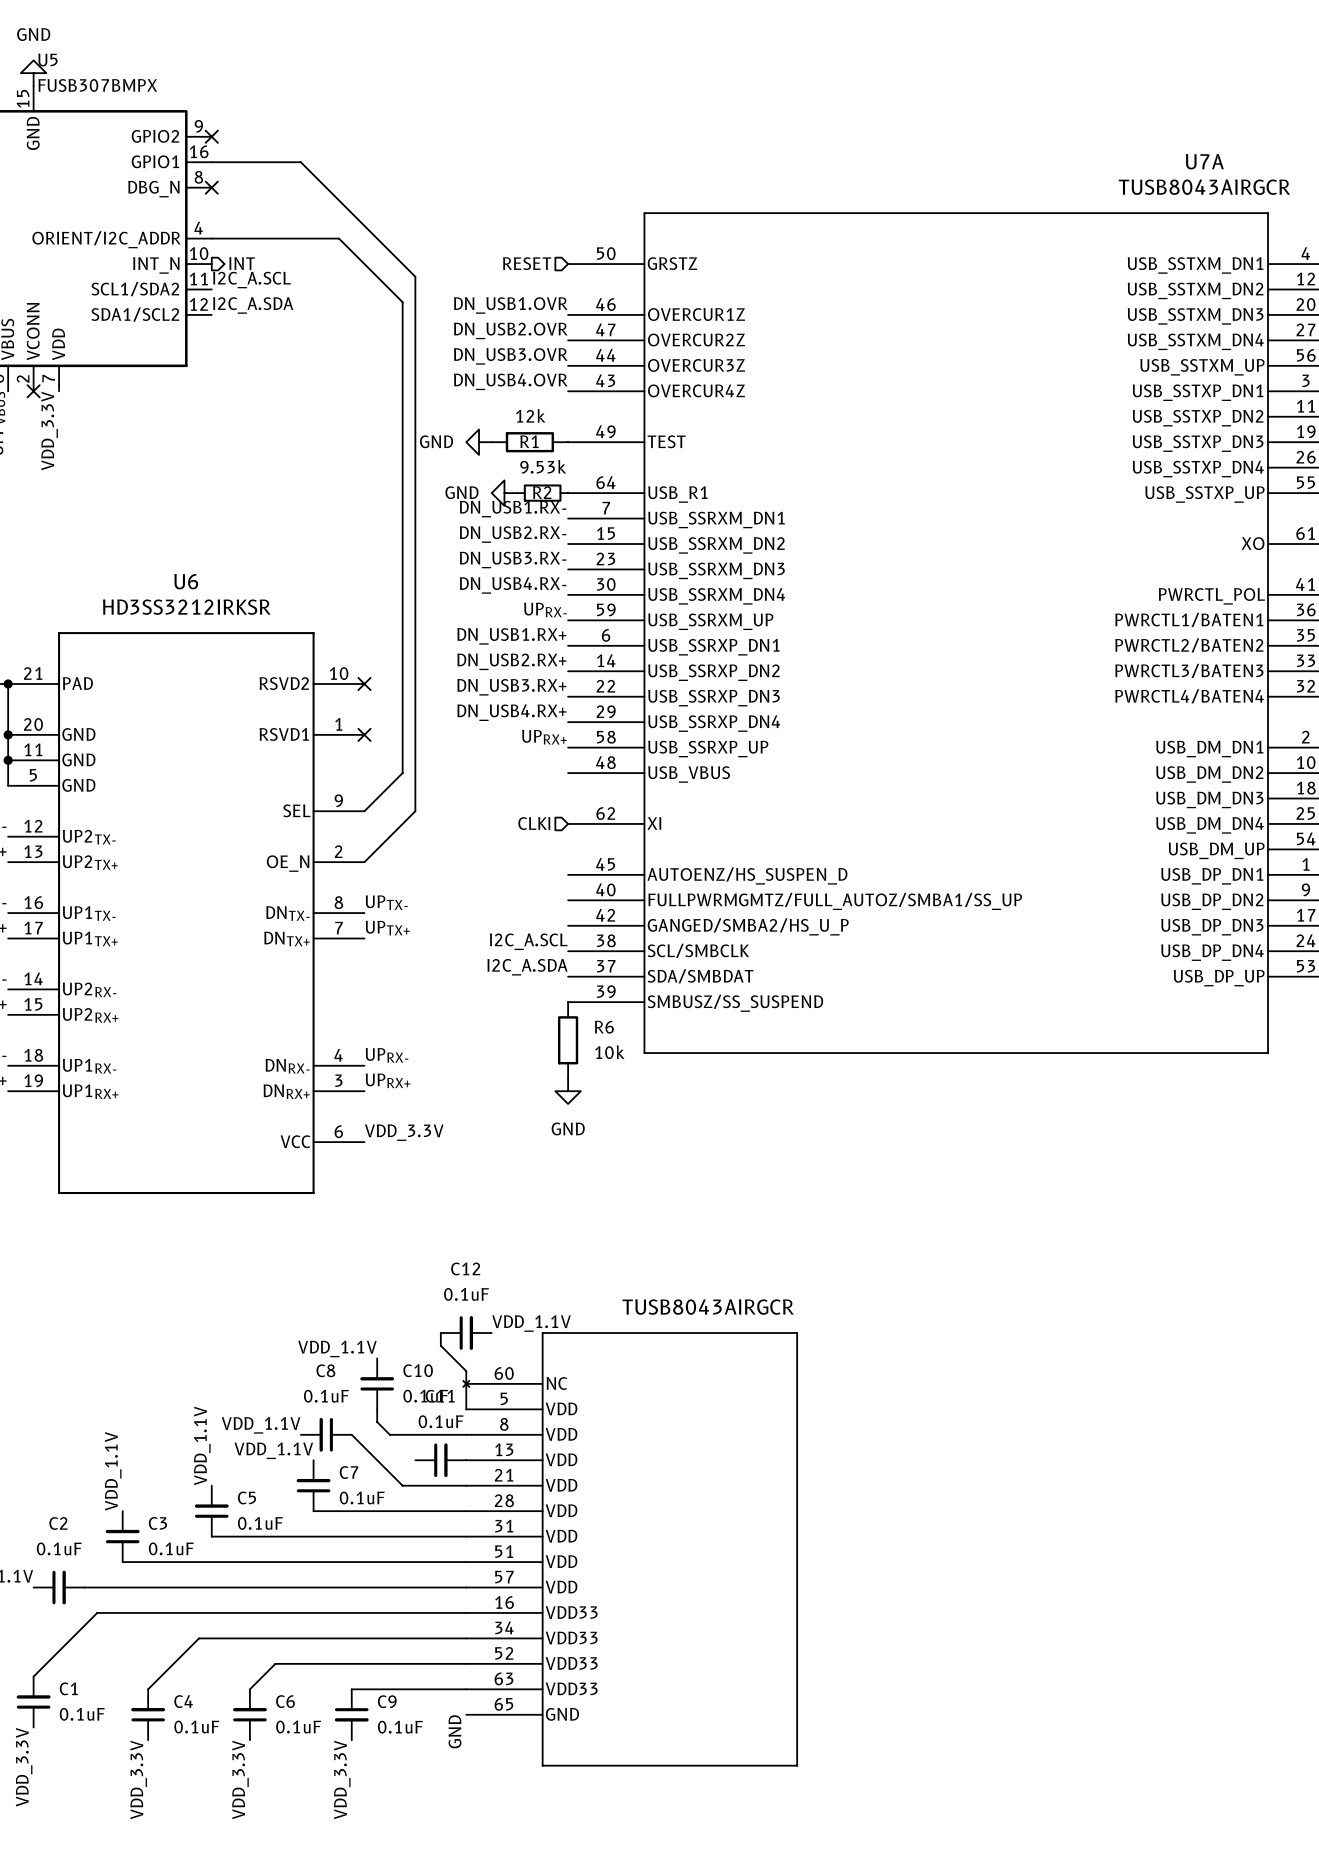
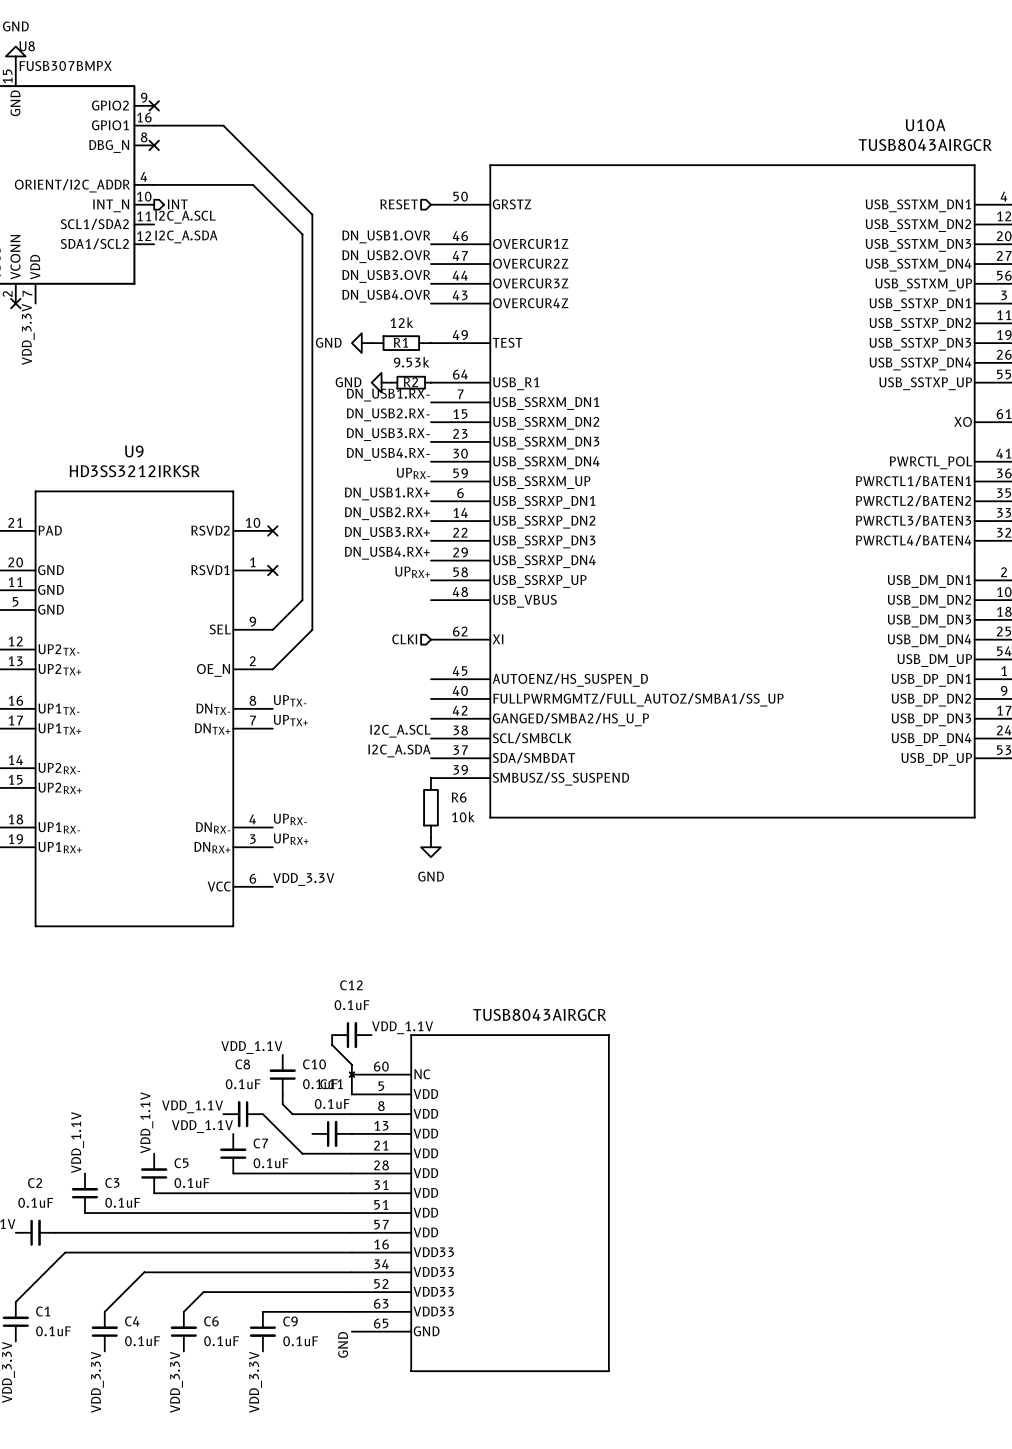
U5 name: U5 (47, 60) -> U8 (27, 46)
U7A name: U7A (1204, 161) -> U10A (925, 125)
U6 name: U6 (186, 581) -> U9 (134, 451)

